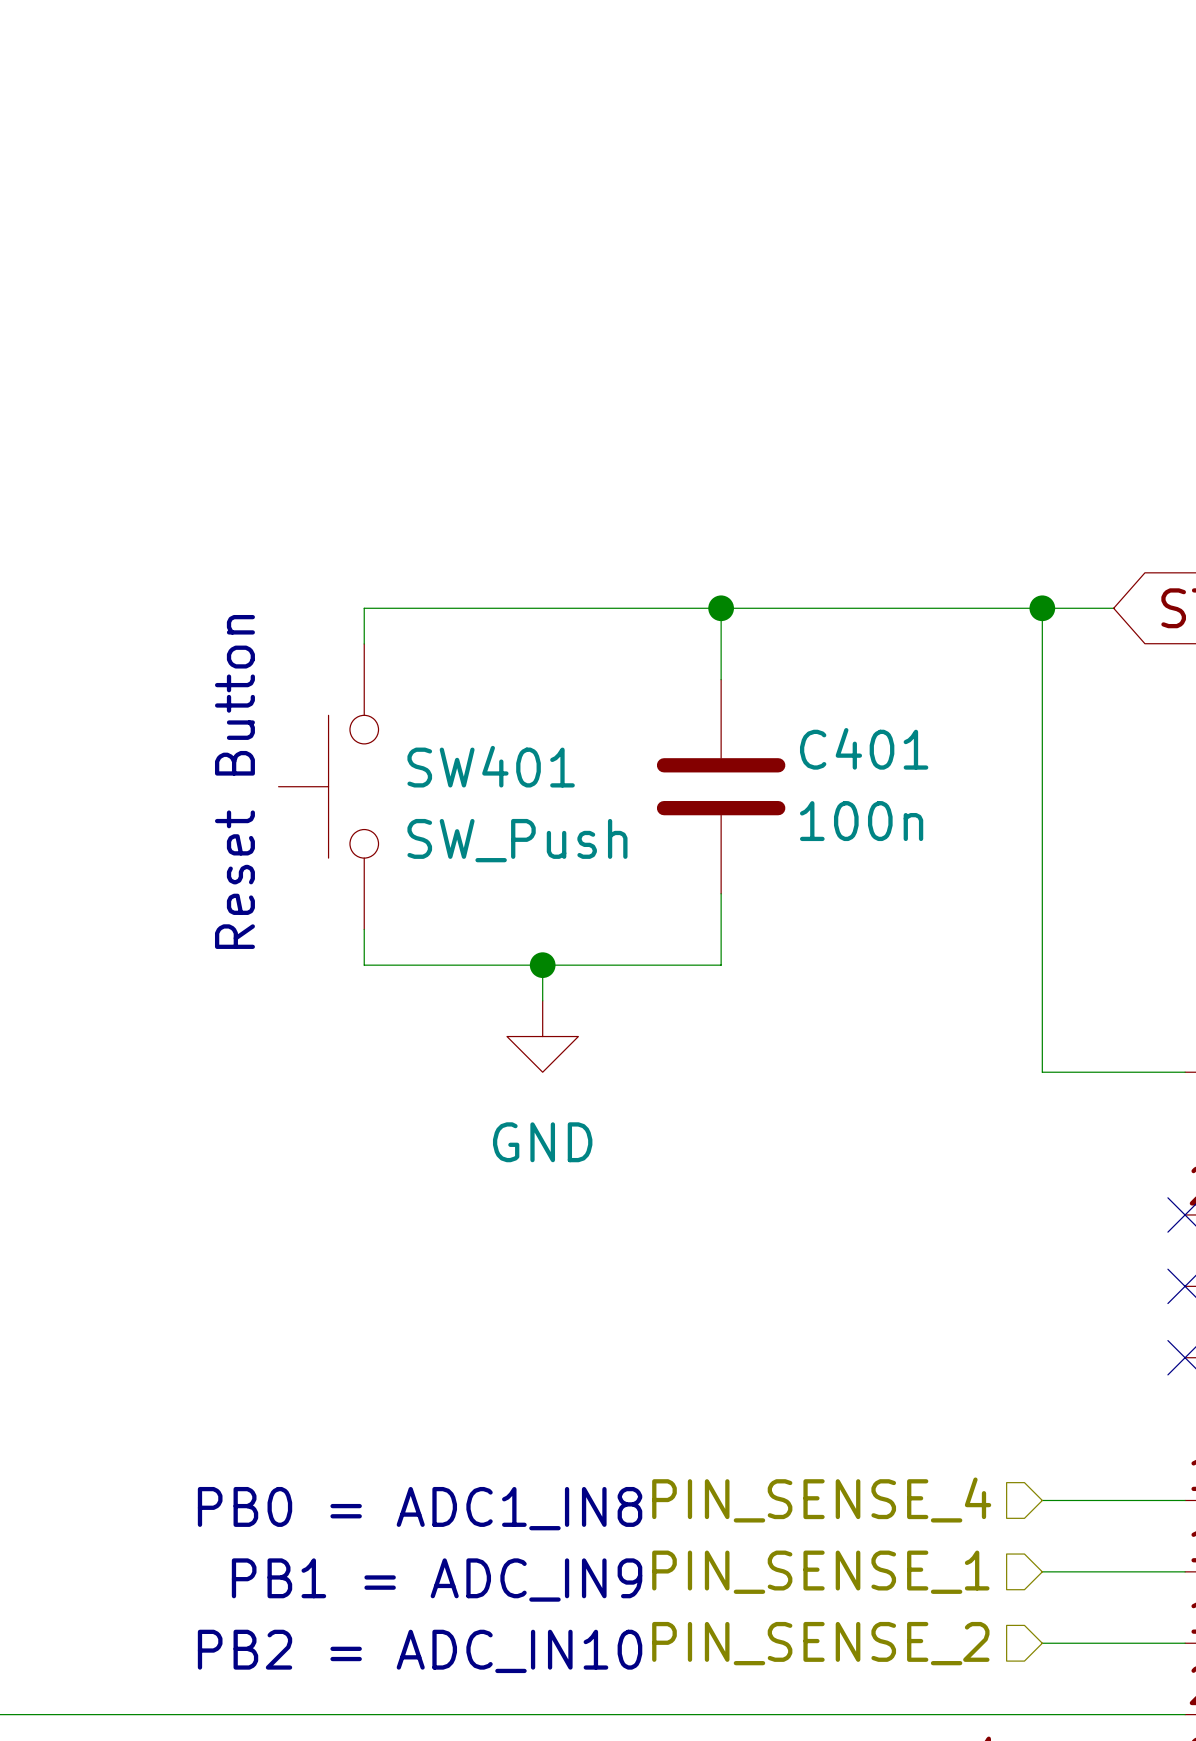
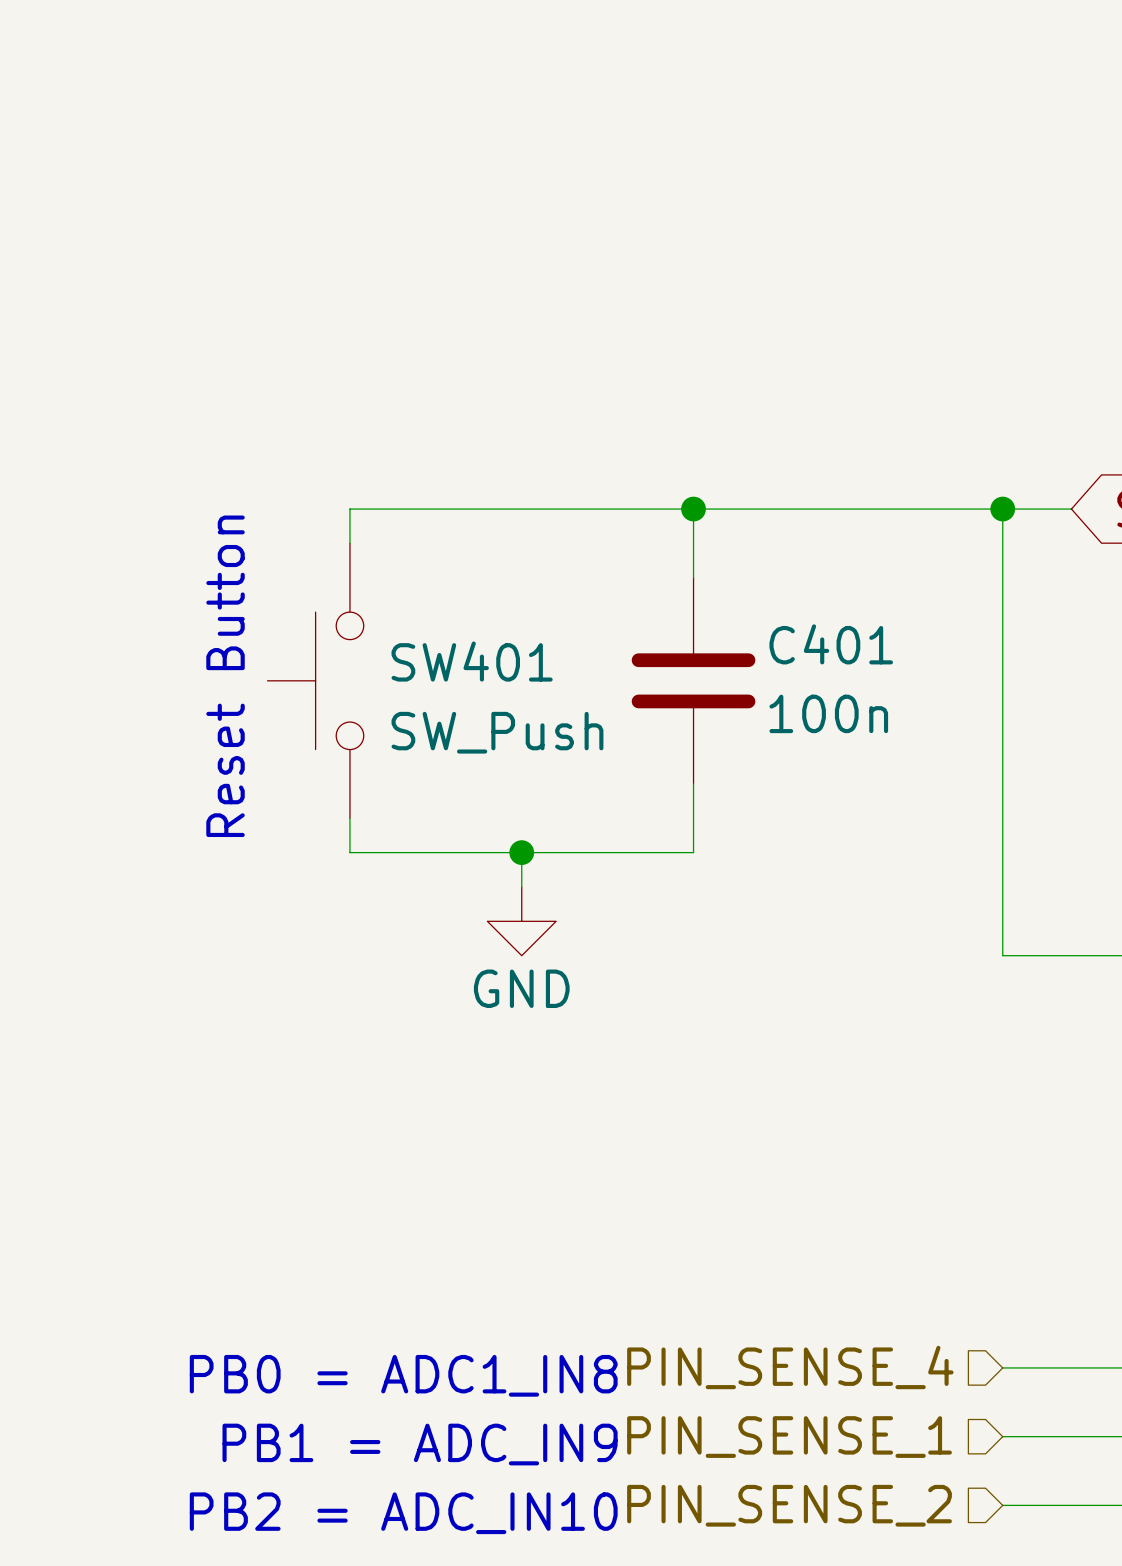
power symbol text position: GND (542, 1142) -> GND (521, 988)

